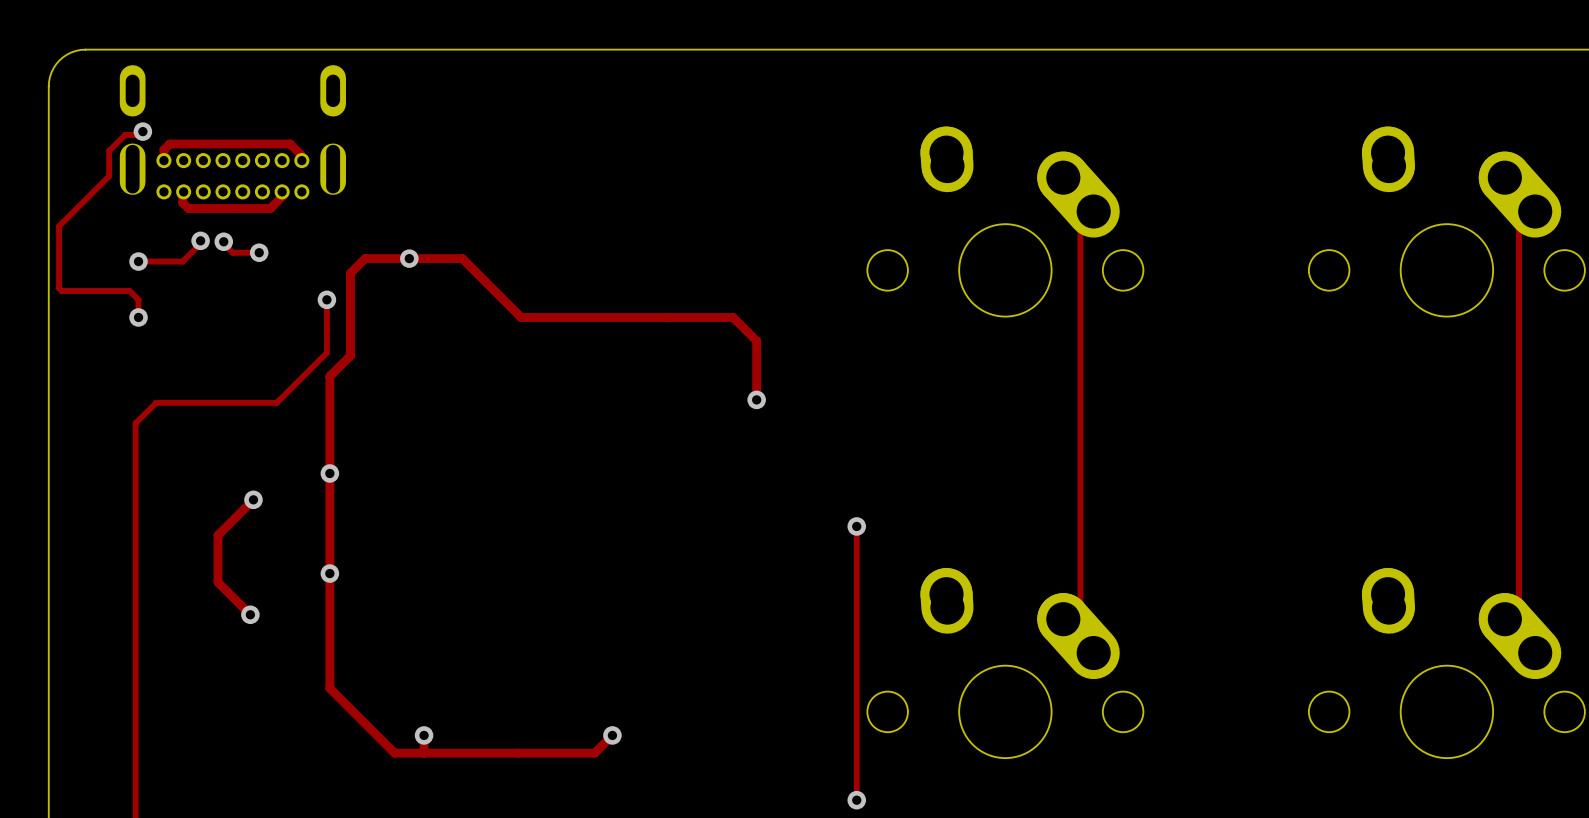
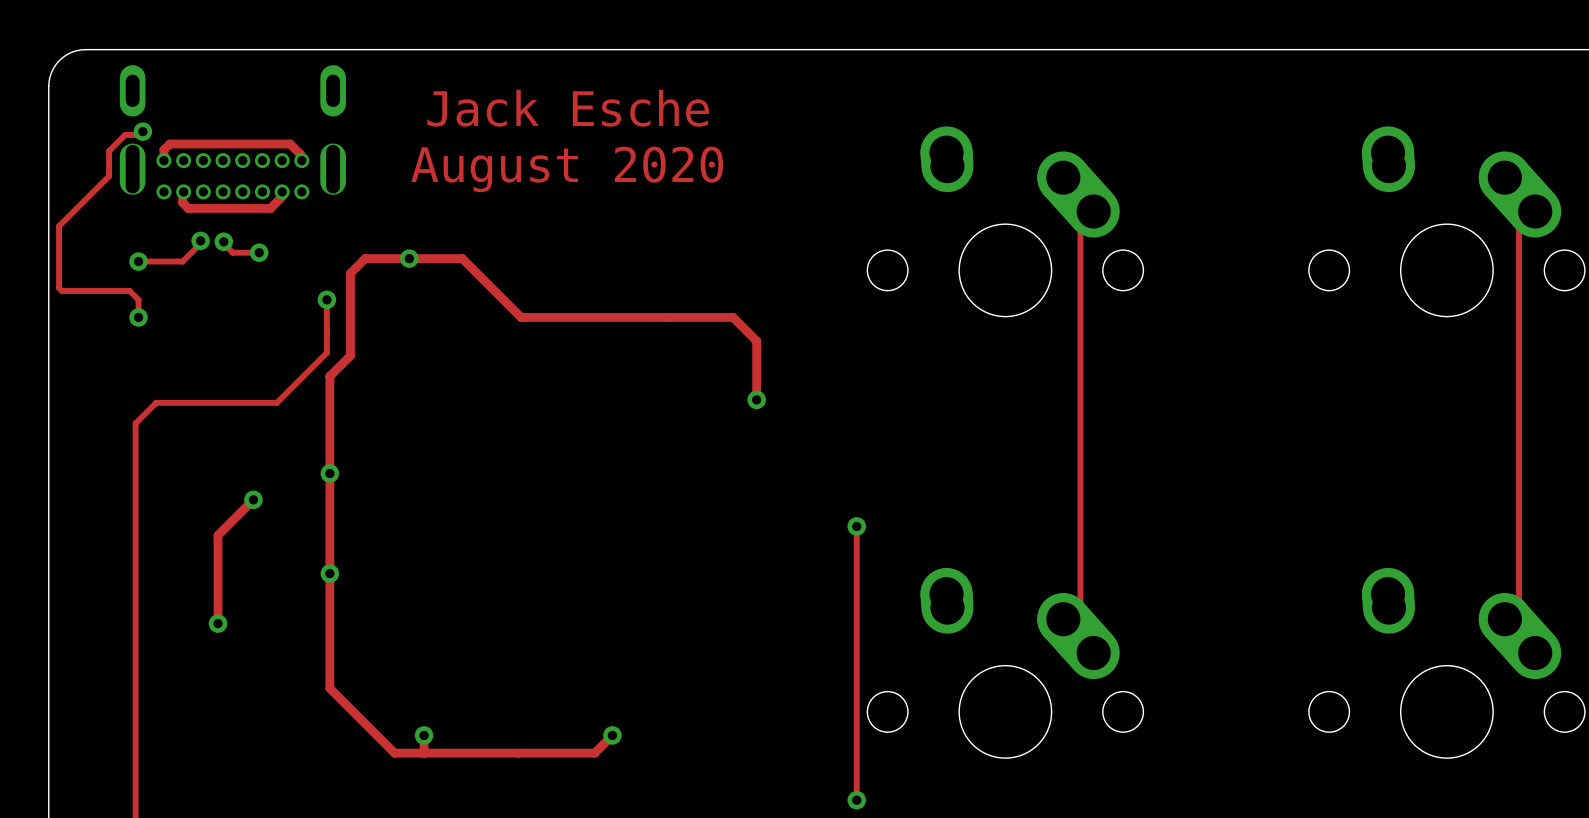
text: none -> Jack Esche (568, 108)
text: none -> August 2020 (567, 169)
track: (218, 582) (250, 614) -> (218, 582) (218, 623)
via position: (250, 614) -> (218, 623)

